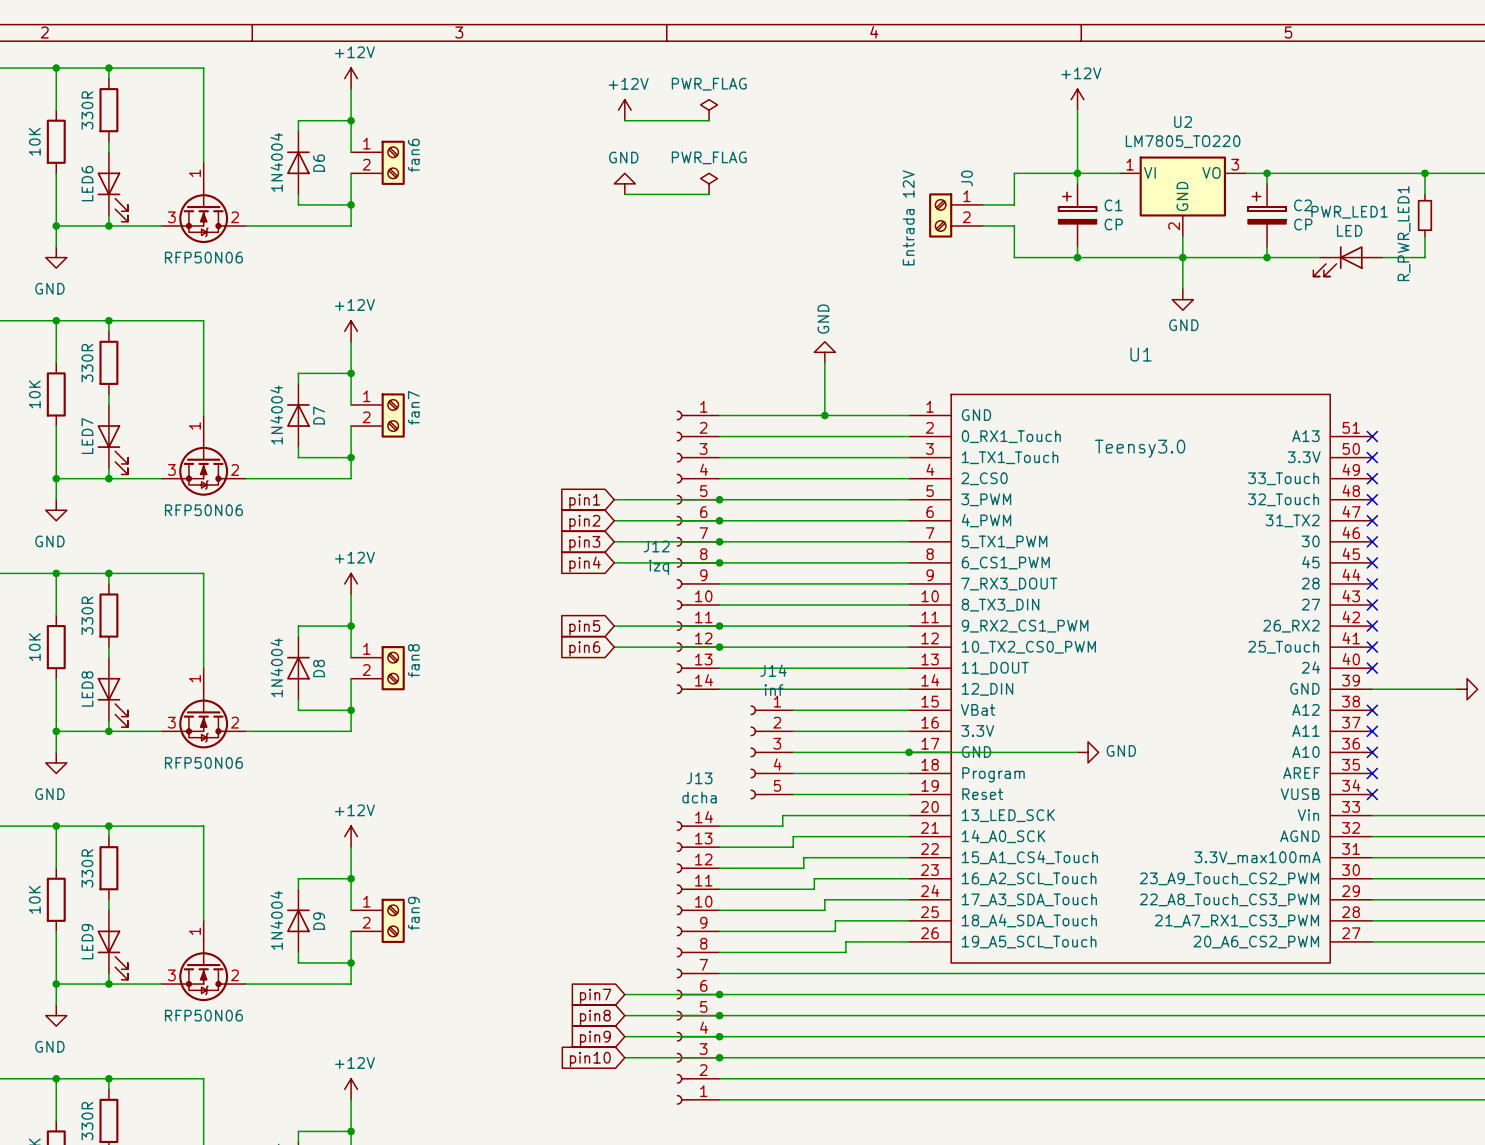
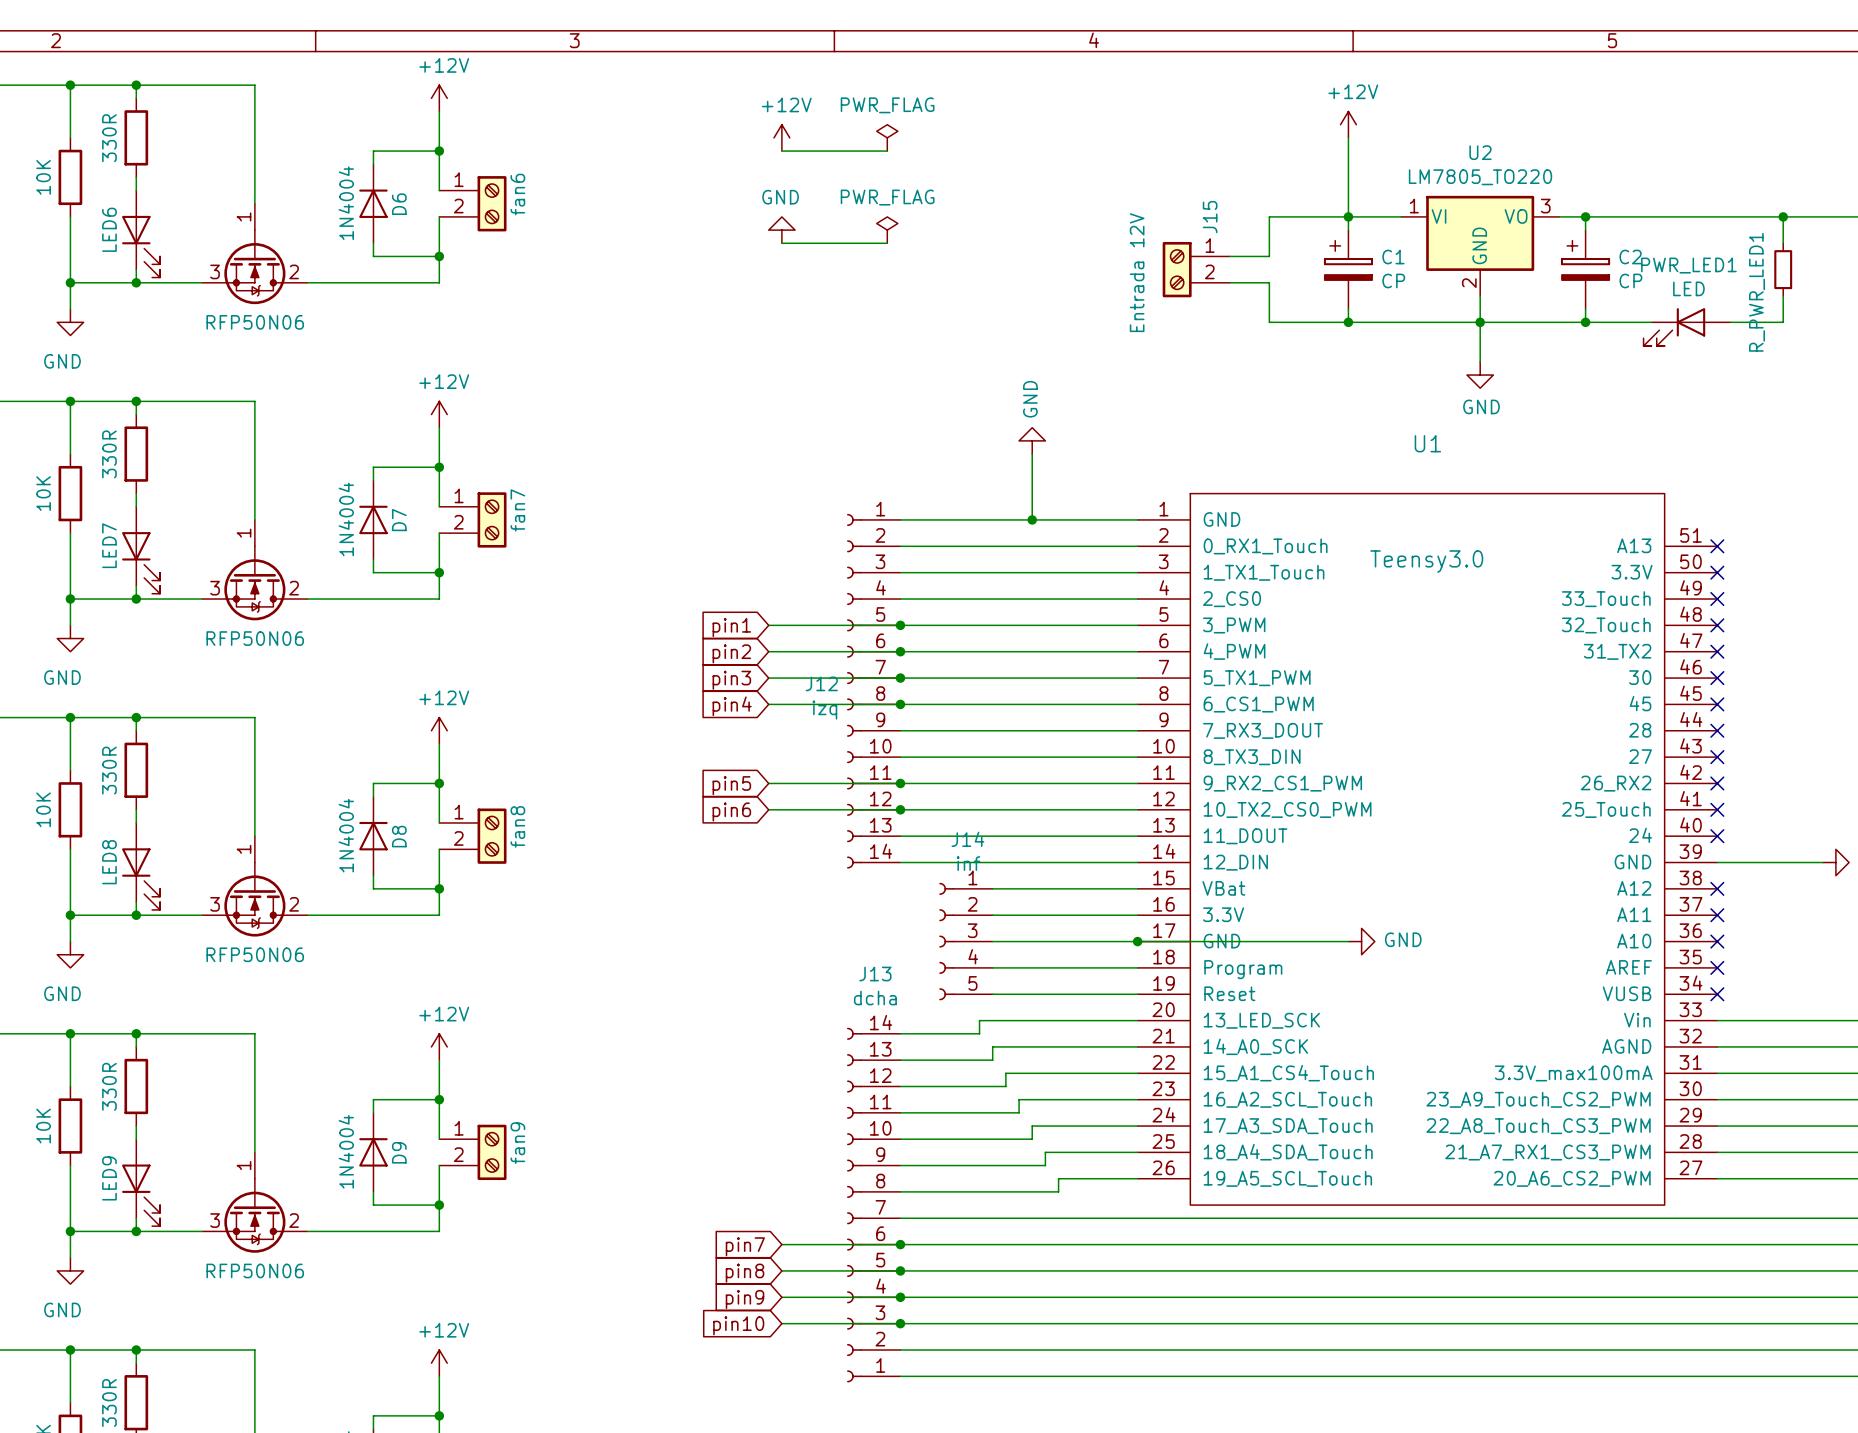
J0 name: J0 (967, 178) -> J15 (1210, 217)

